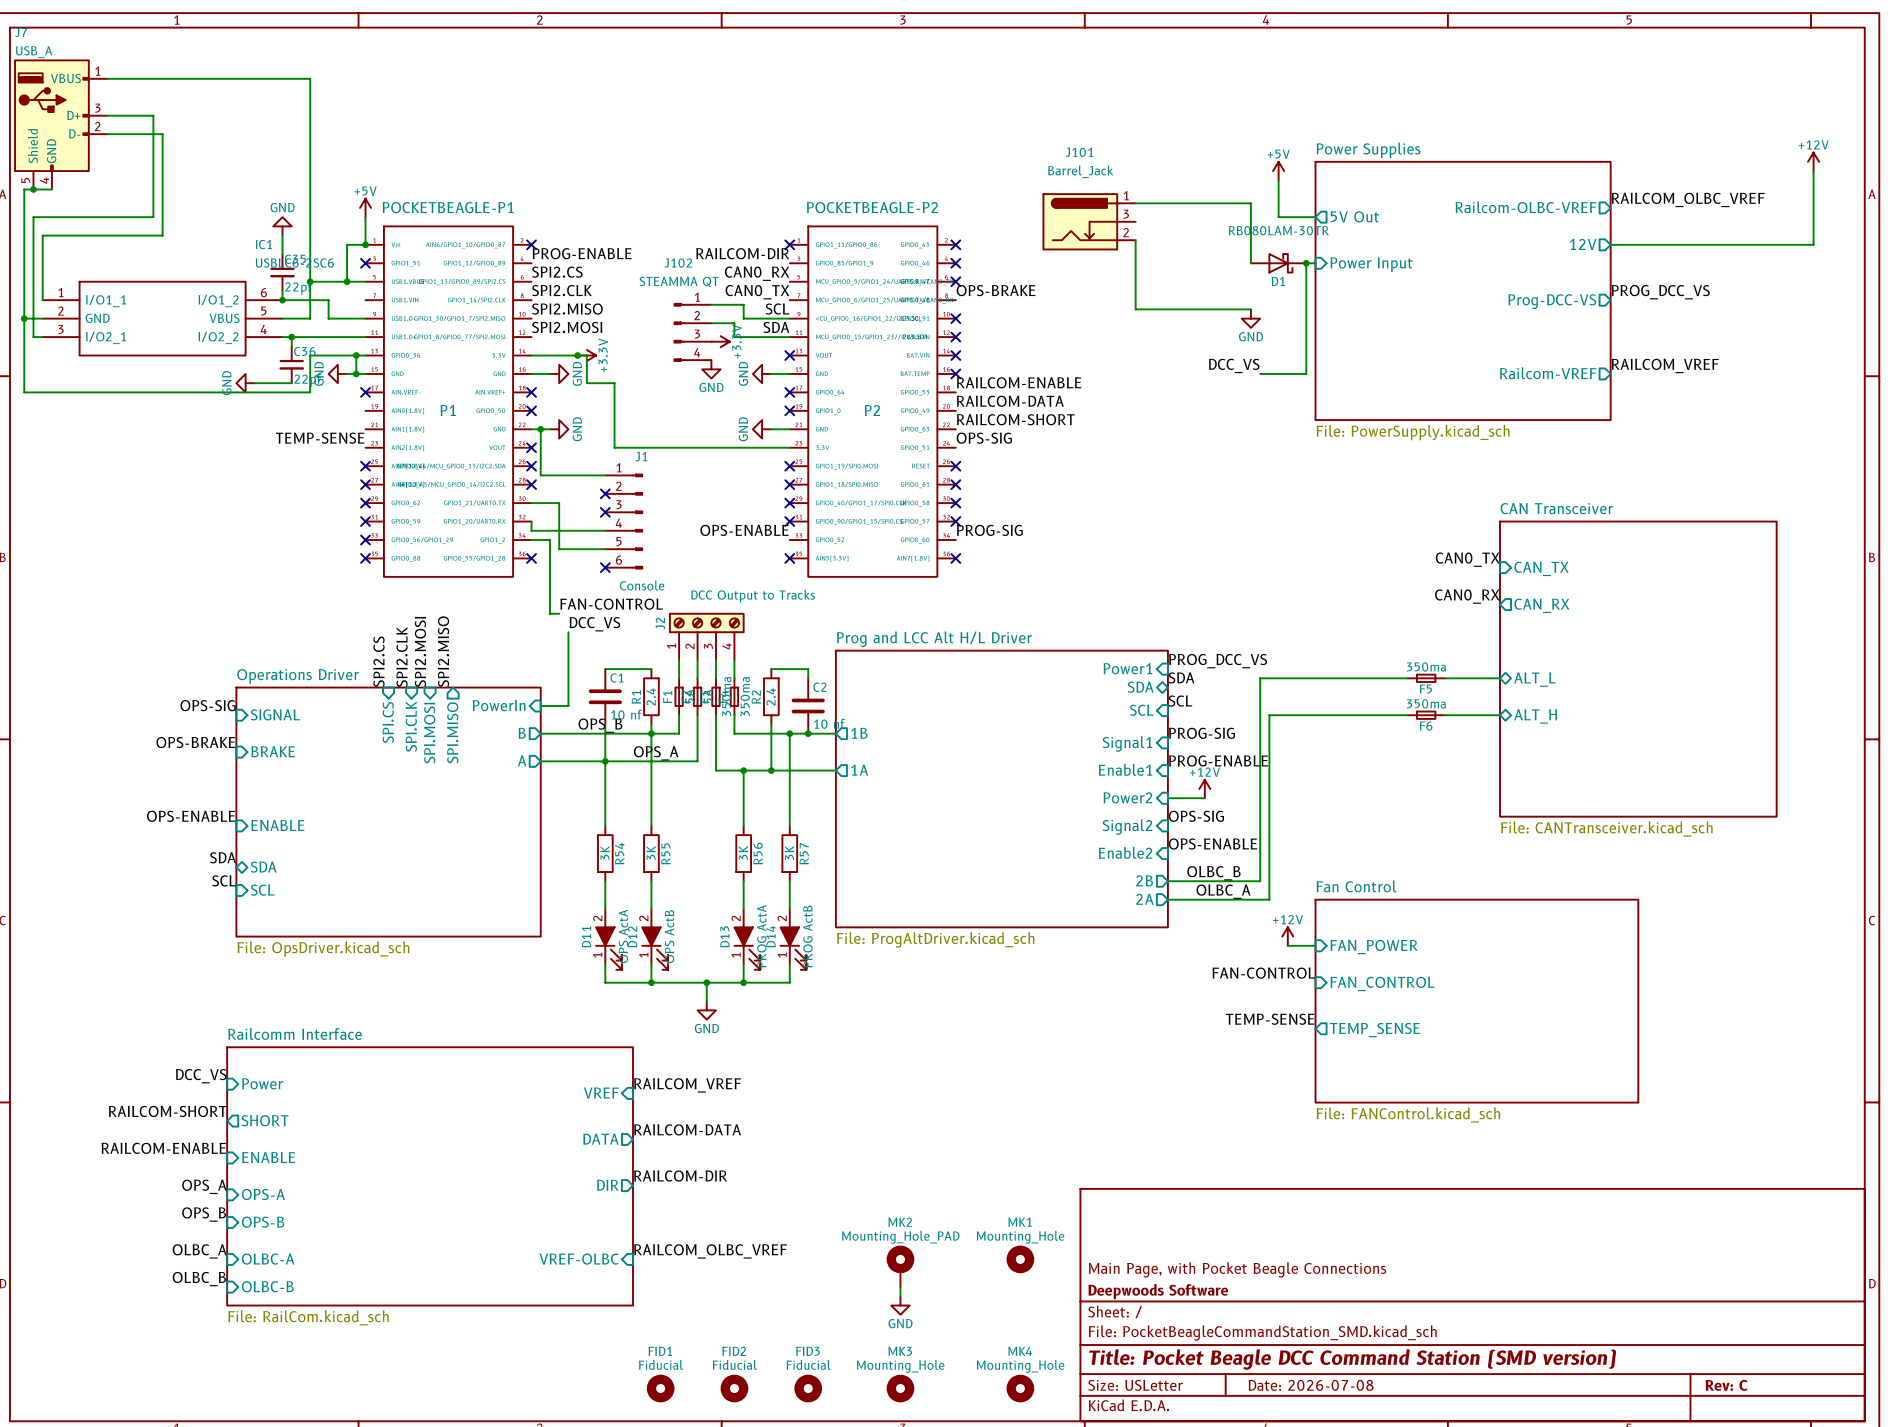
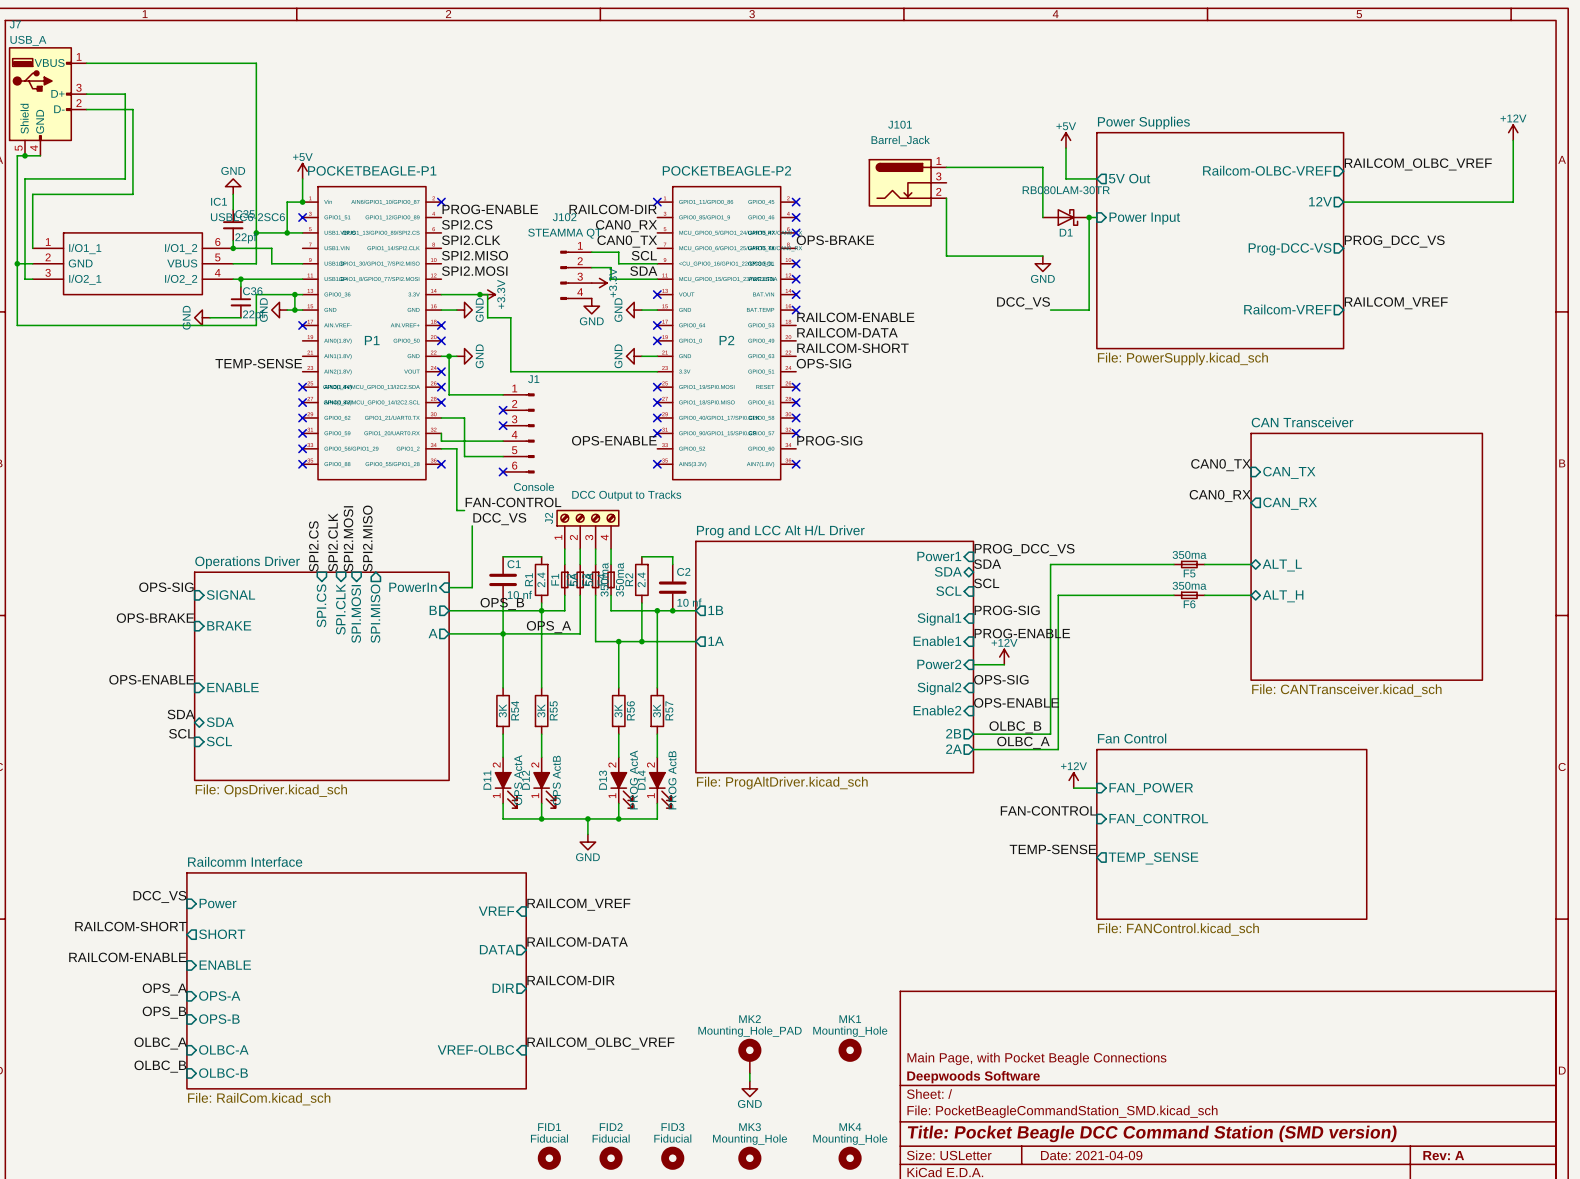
title block: Date: 2026-07-08 (1311, 1385) -> Date: 2021-04-09 (1091, 1155)
title block: Rev: C (1726, 1385) -> Rev: A (1443, 1155)

